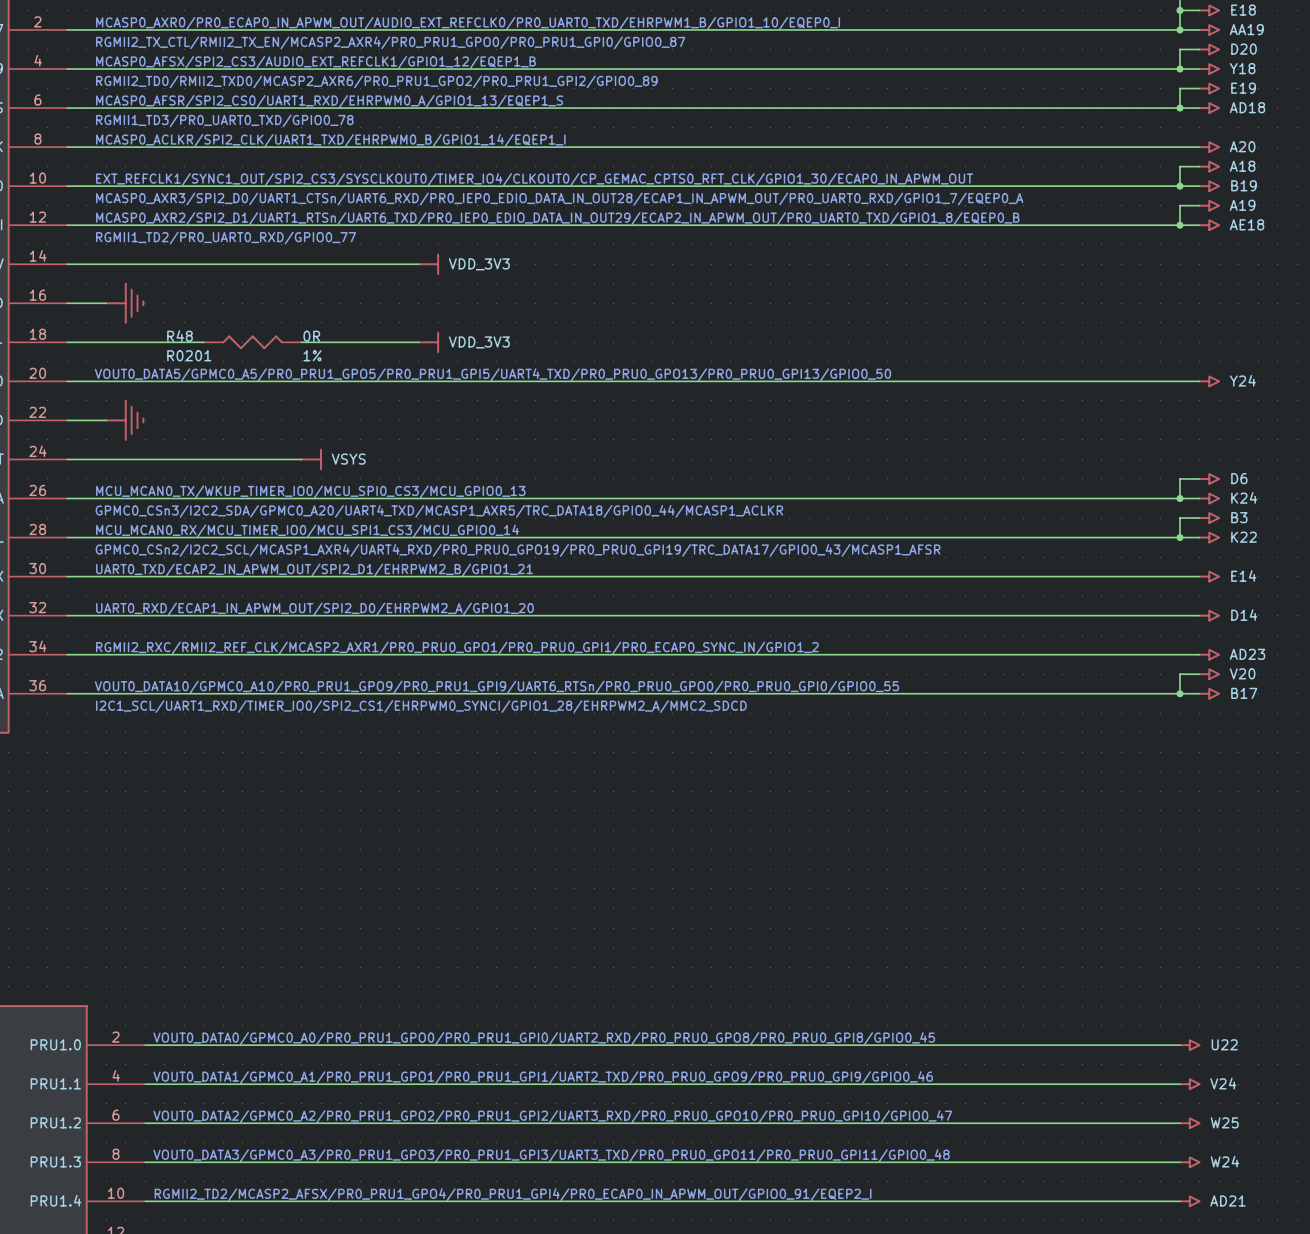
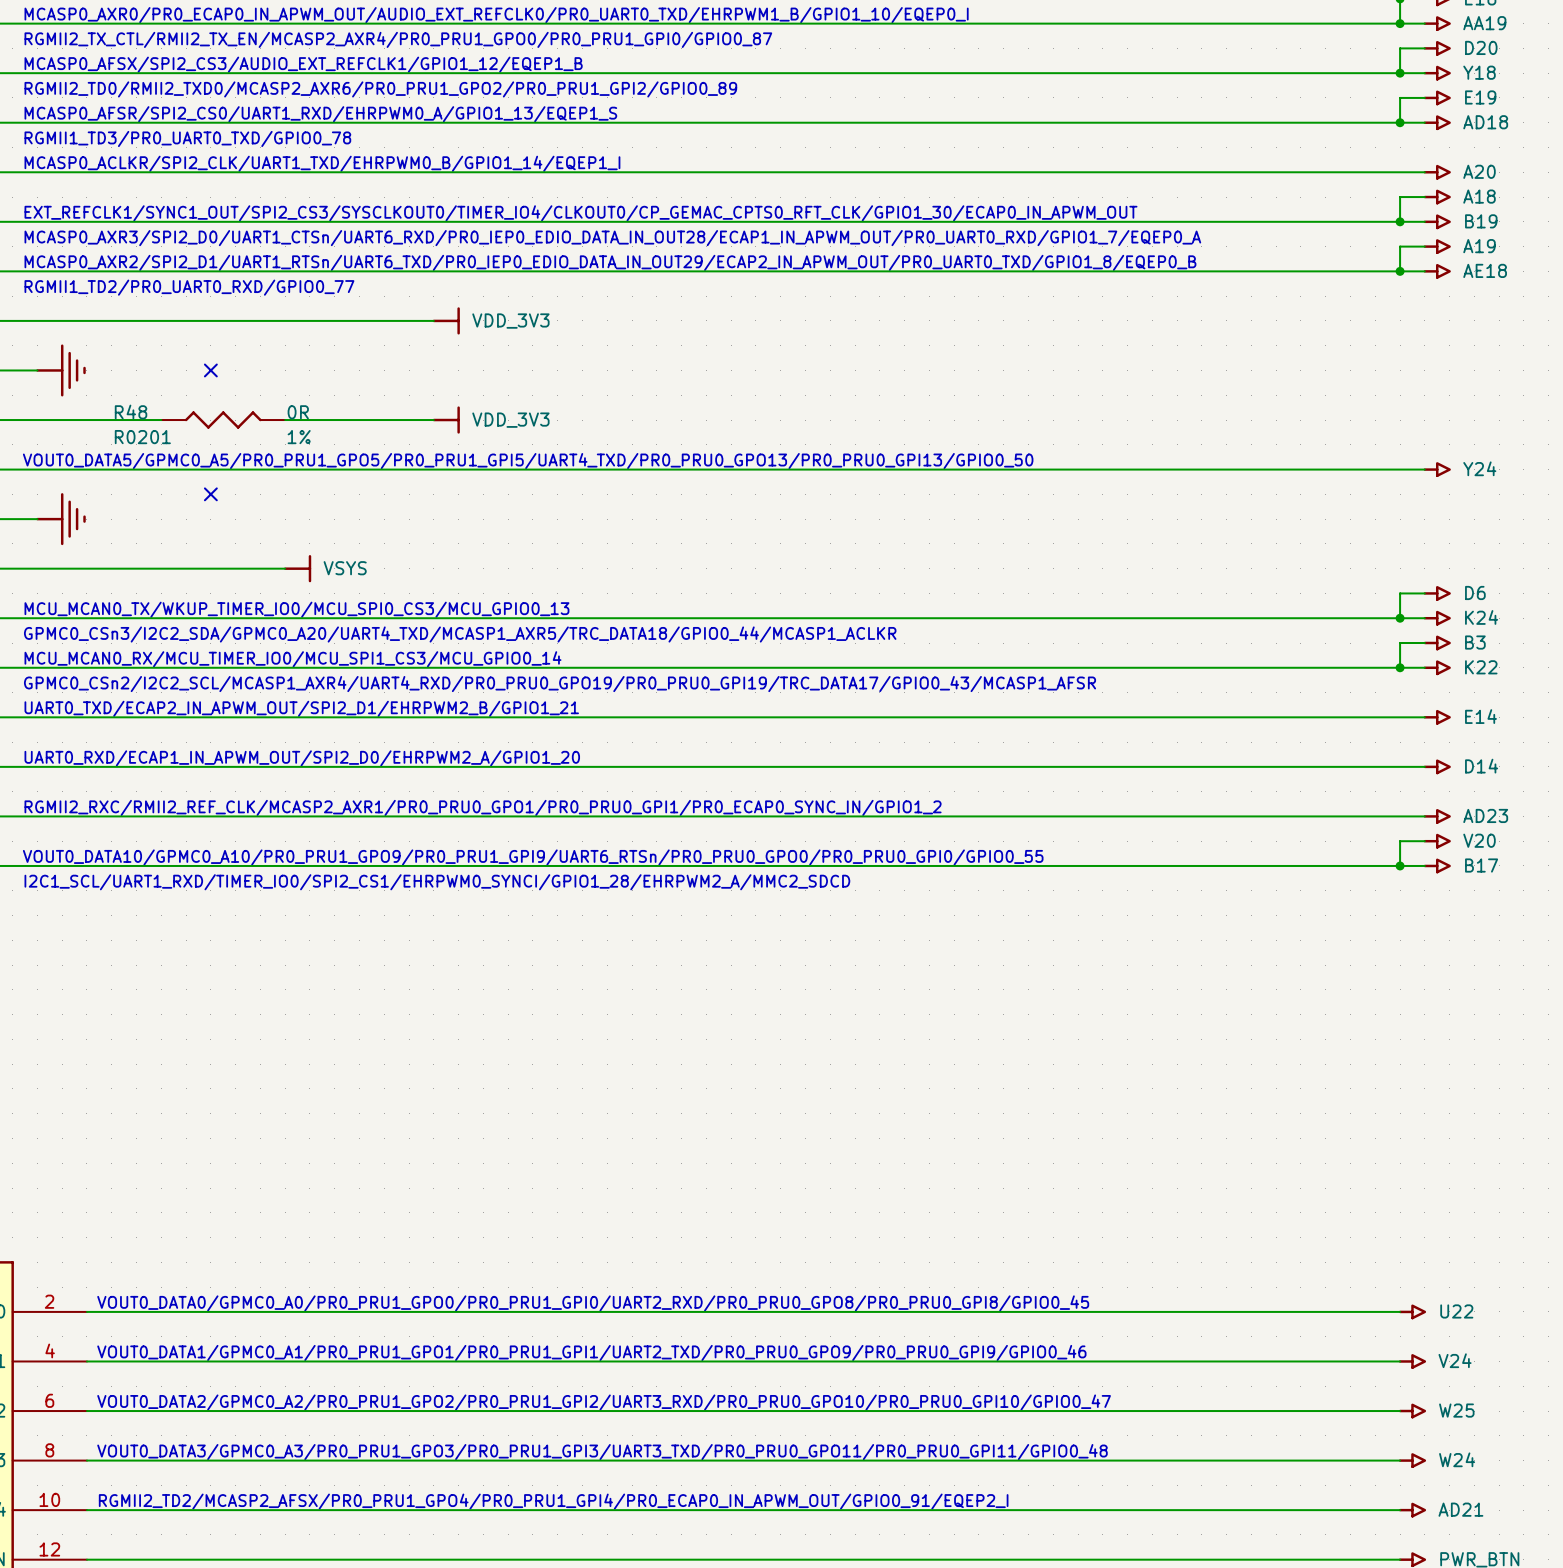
no-connect mark: none -> (210, 370)
no-connect mark: none -> (210, 494)

